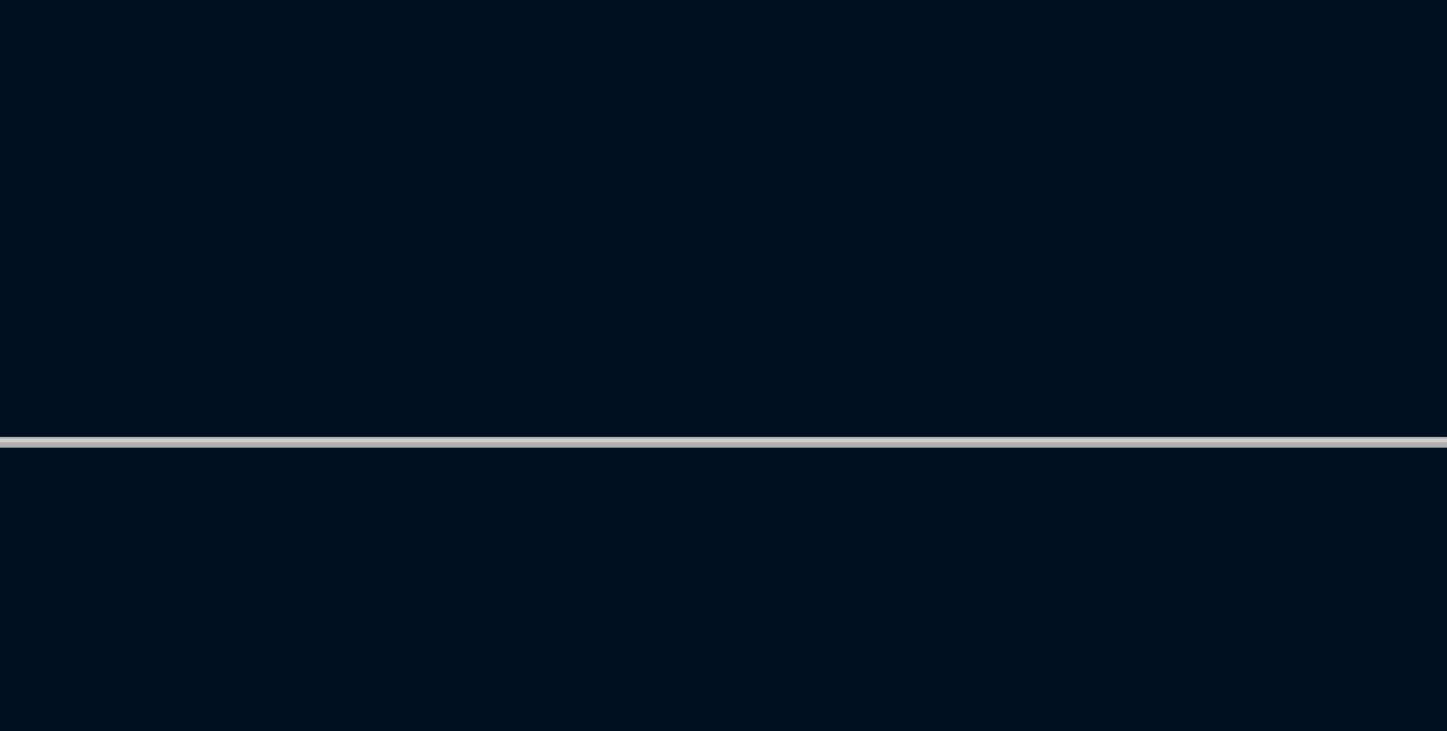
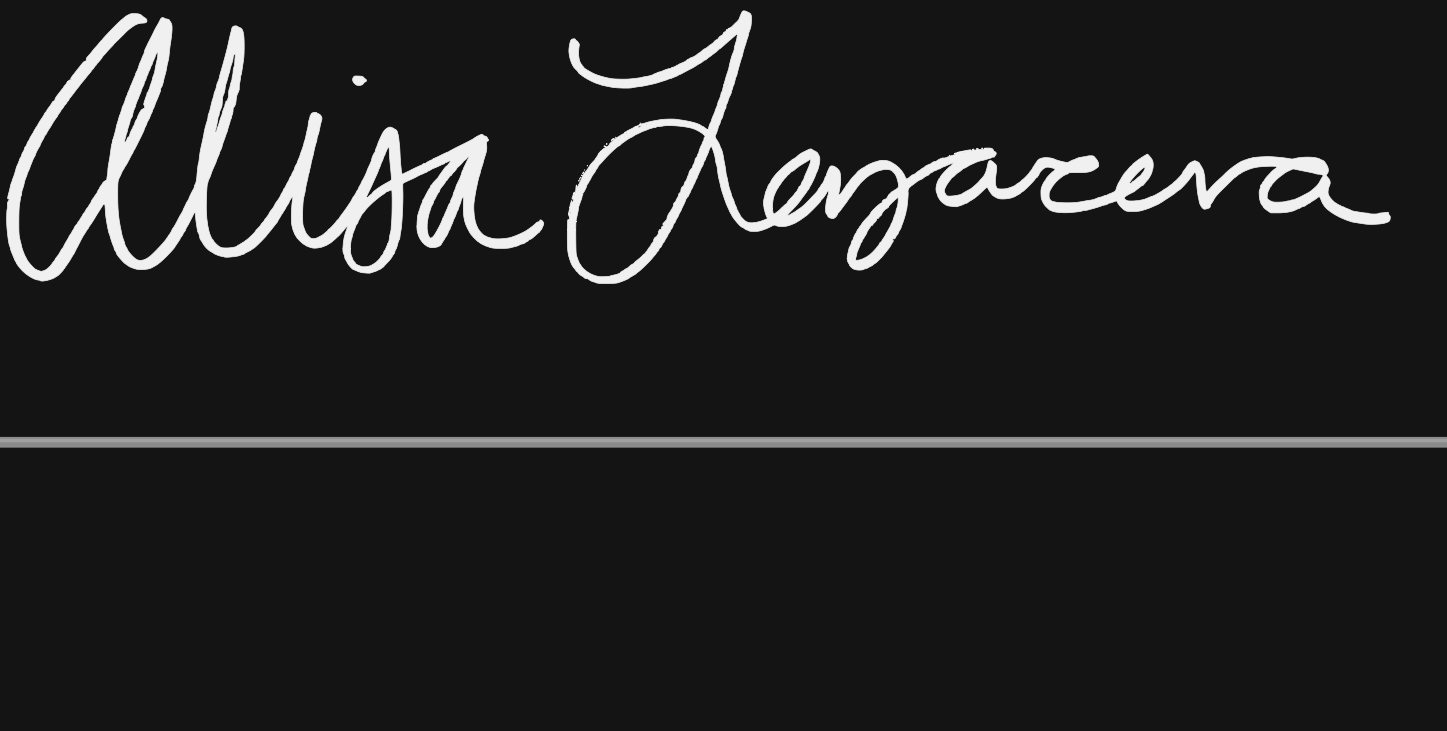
drawing: none -> [6, 10, 1391, 284]

